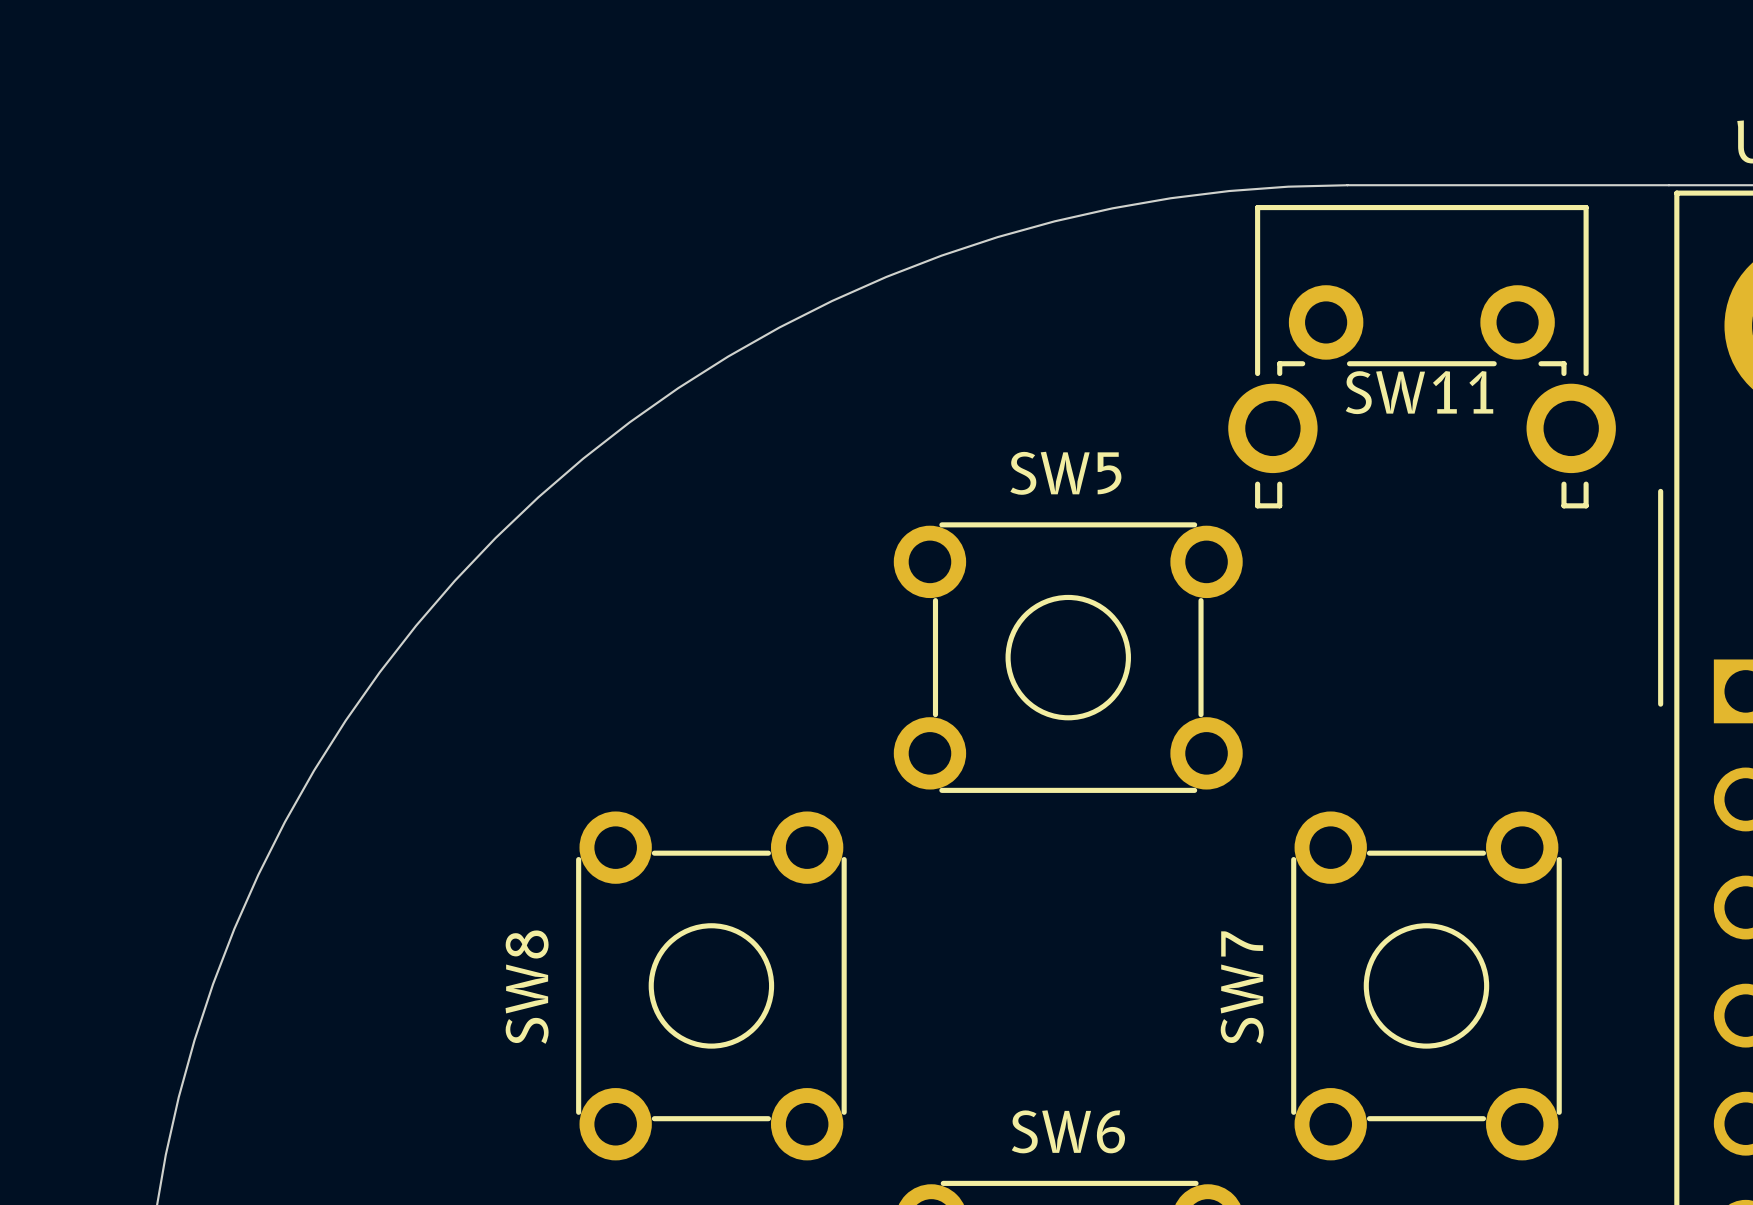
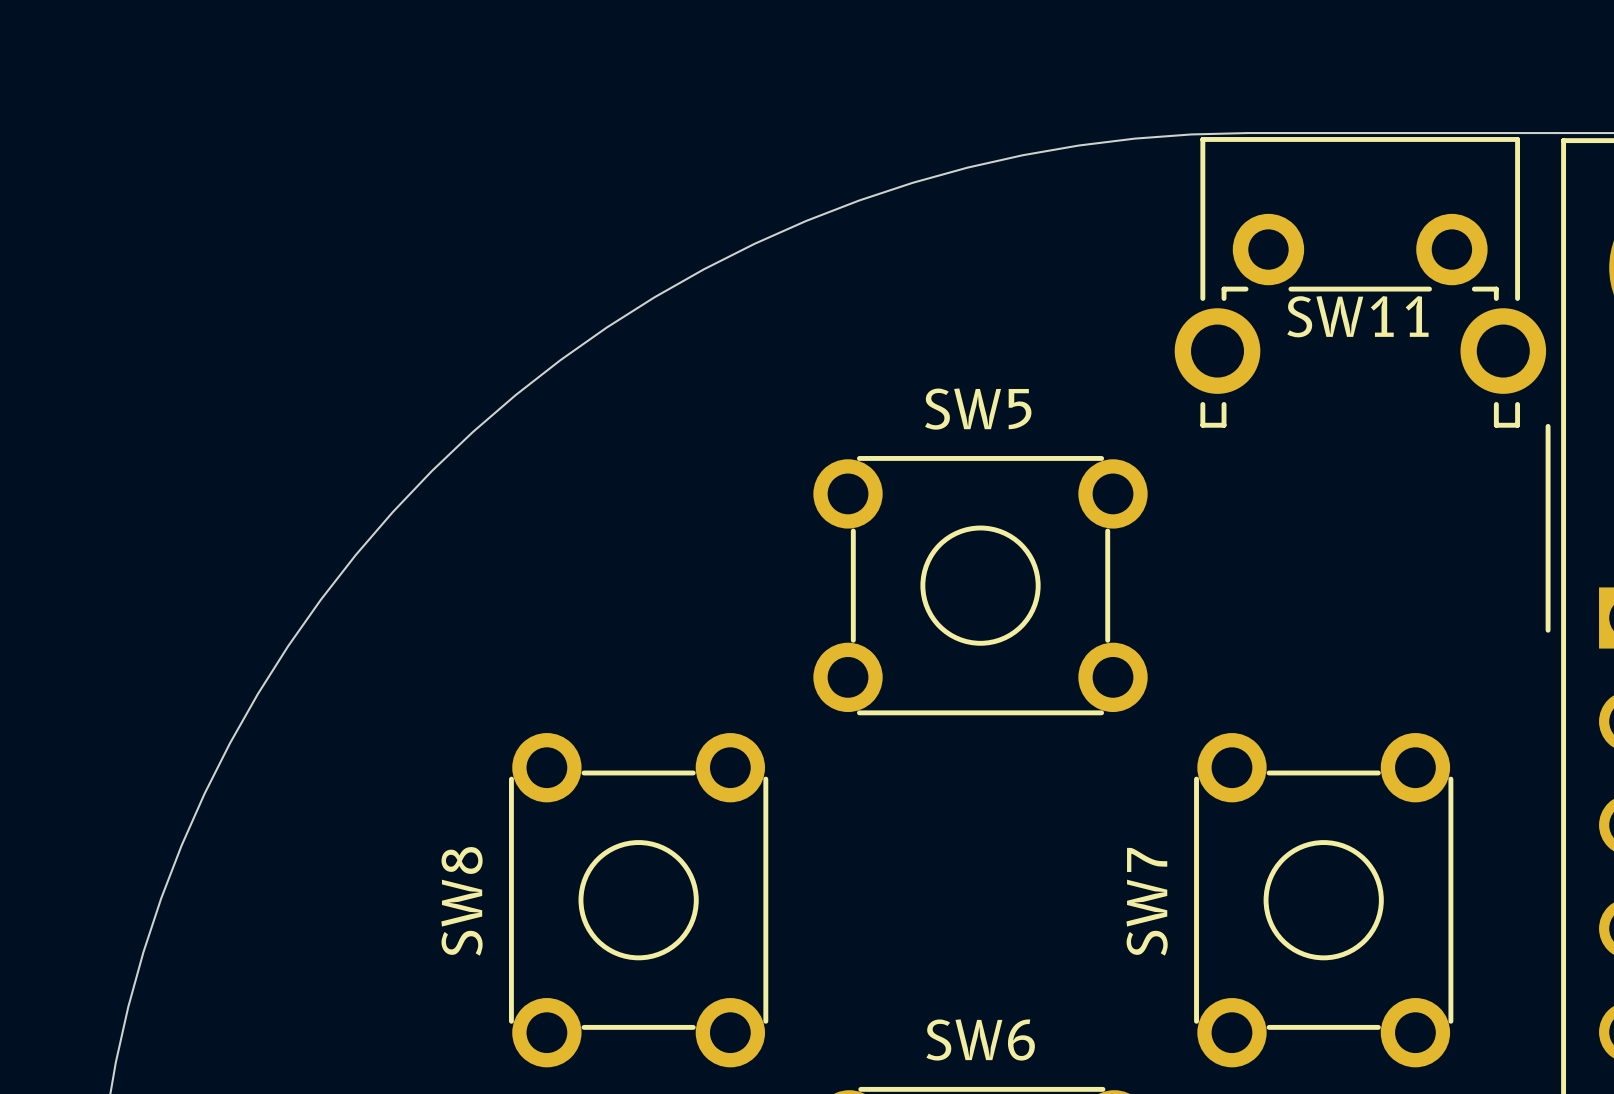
SW11 position: (1422, 356) -> (1360, 282)

